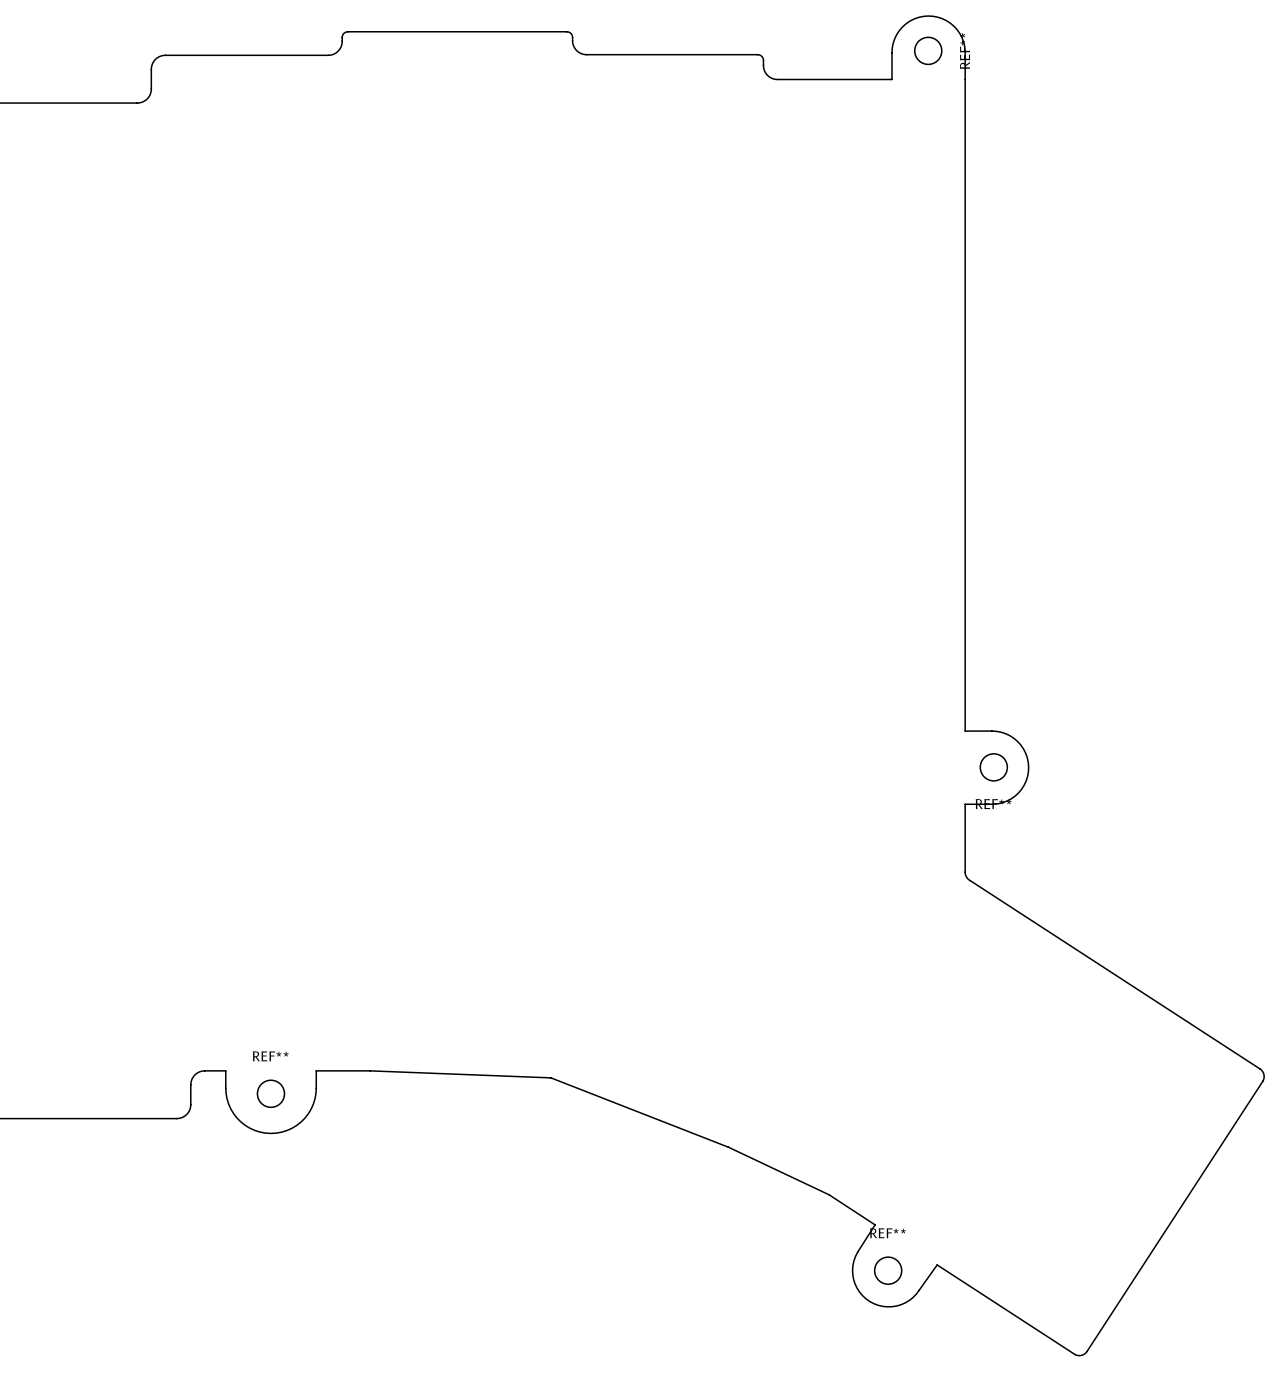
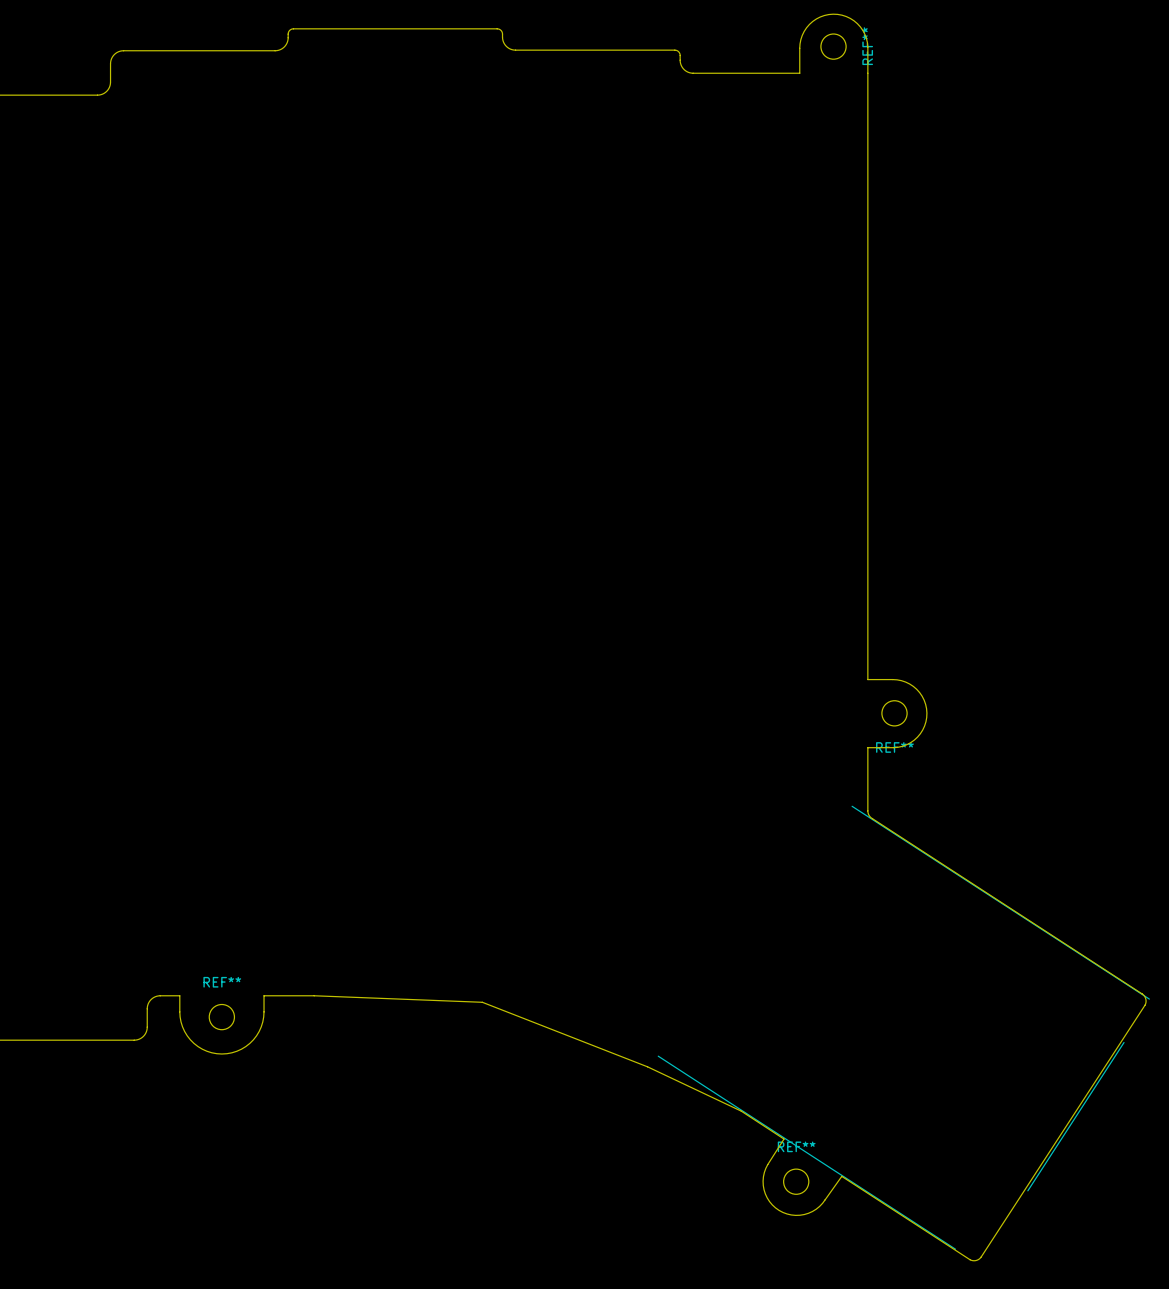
line: none -> (852, 806) (1149, 999)
line: none -> (1124, 1042) (1027, 1190)
line: none -> (658, 1056) (955, 1249)

